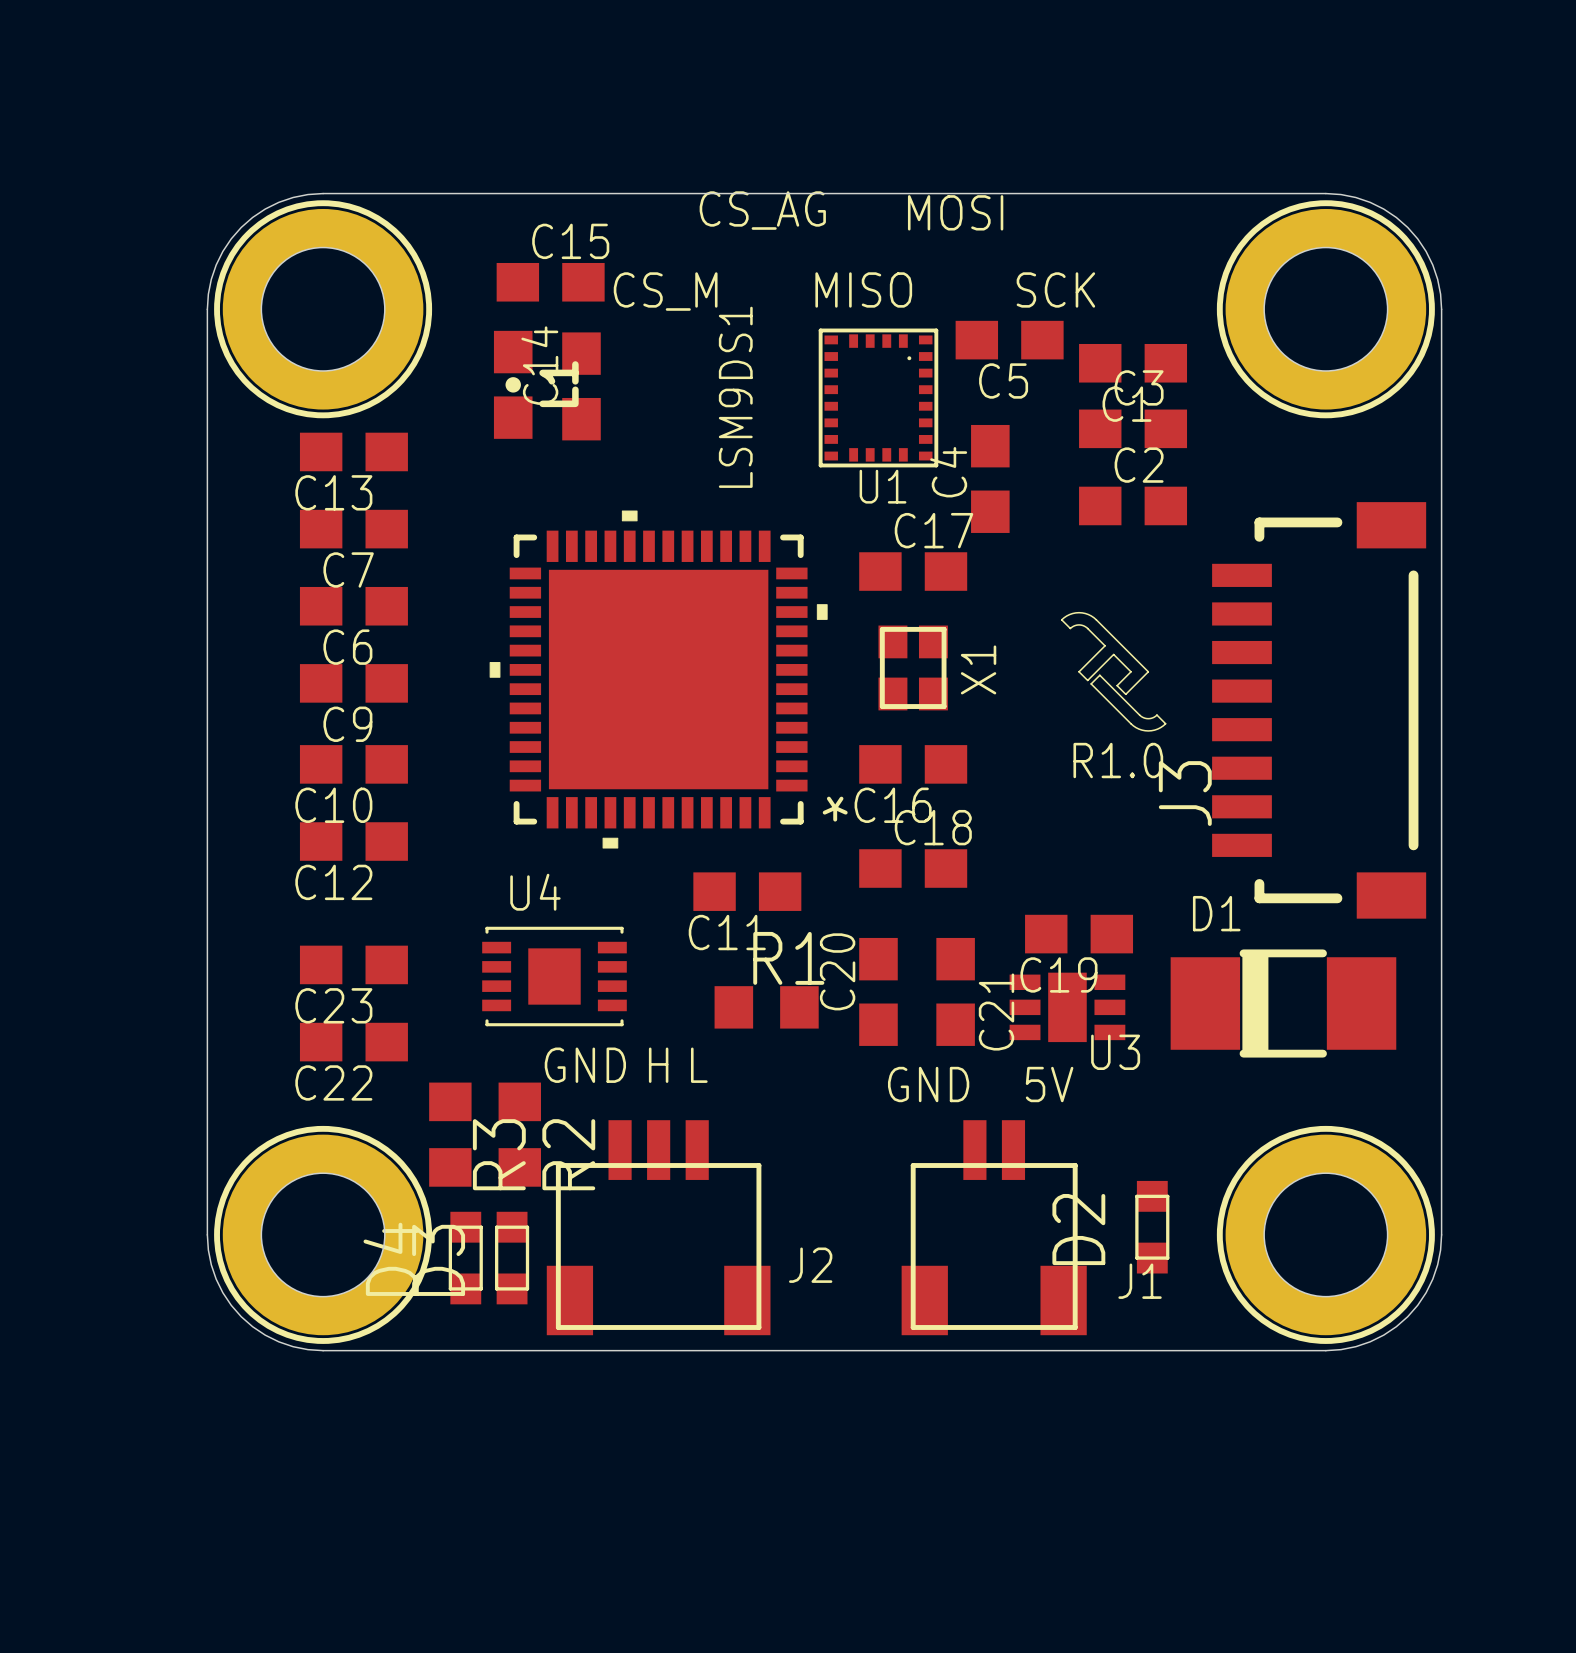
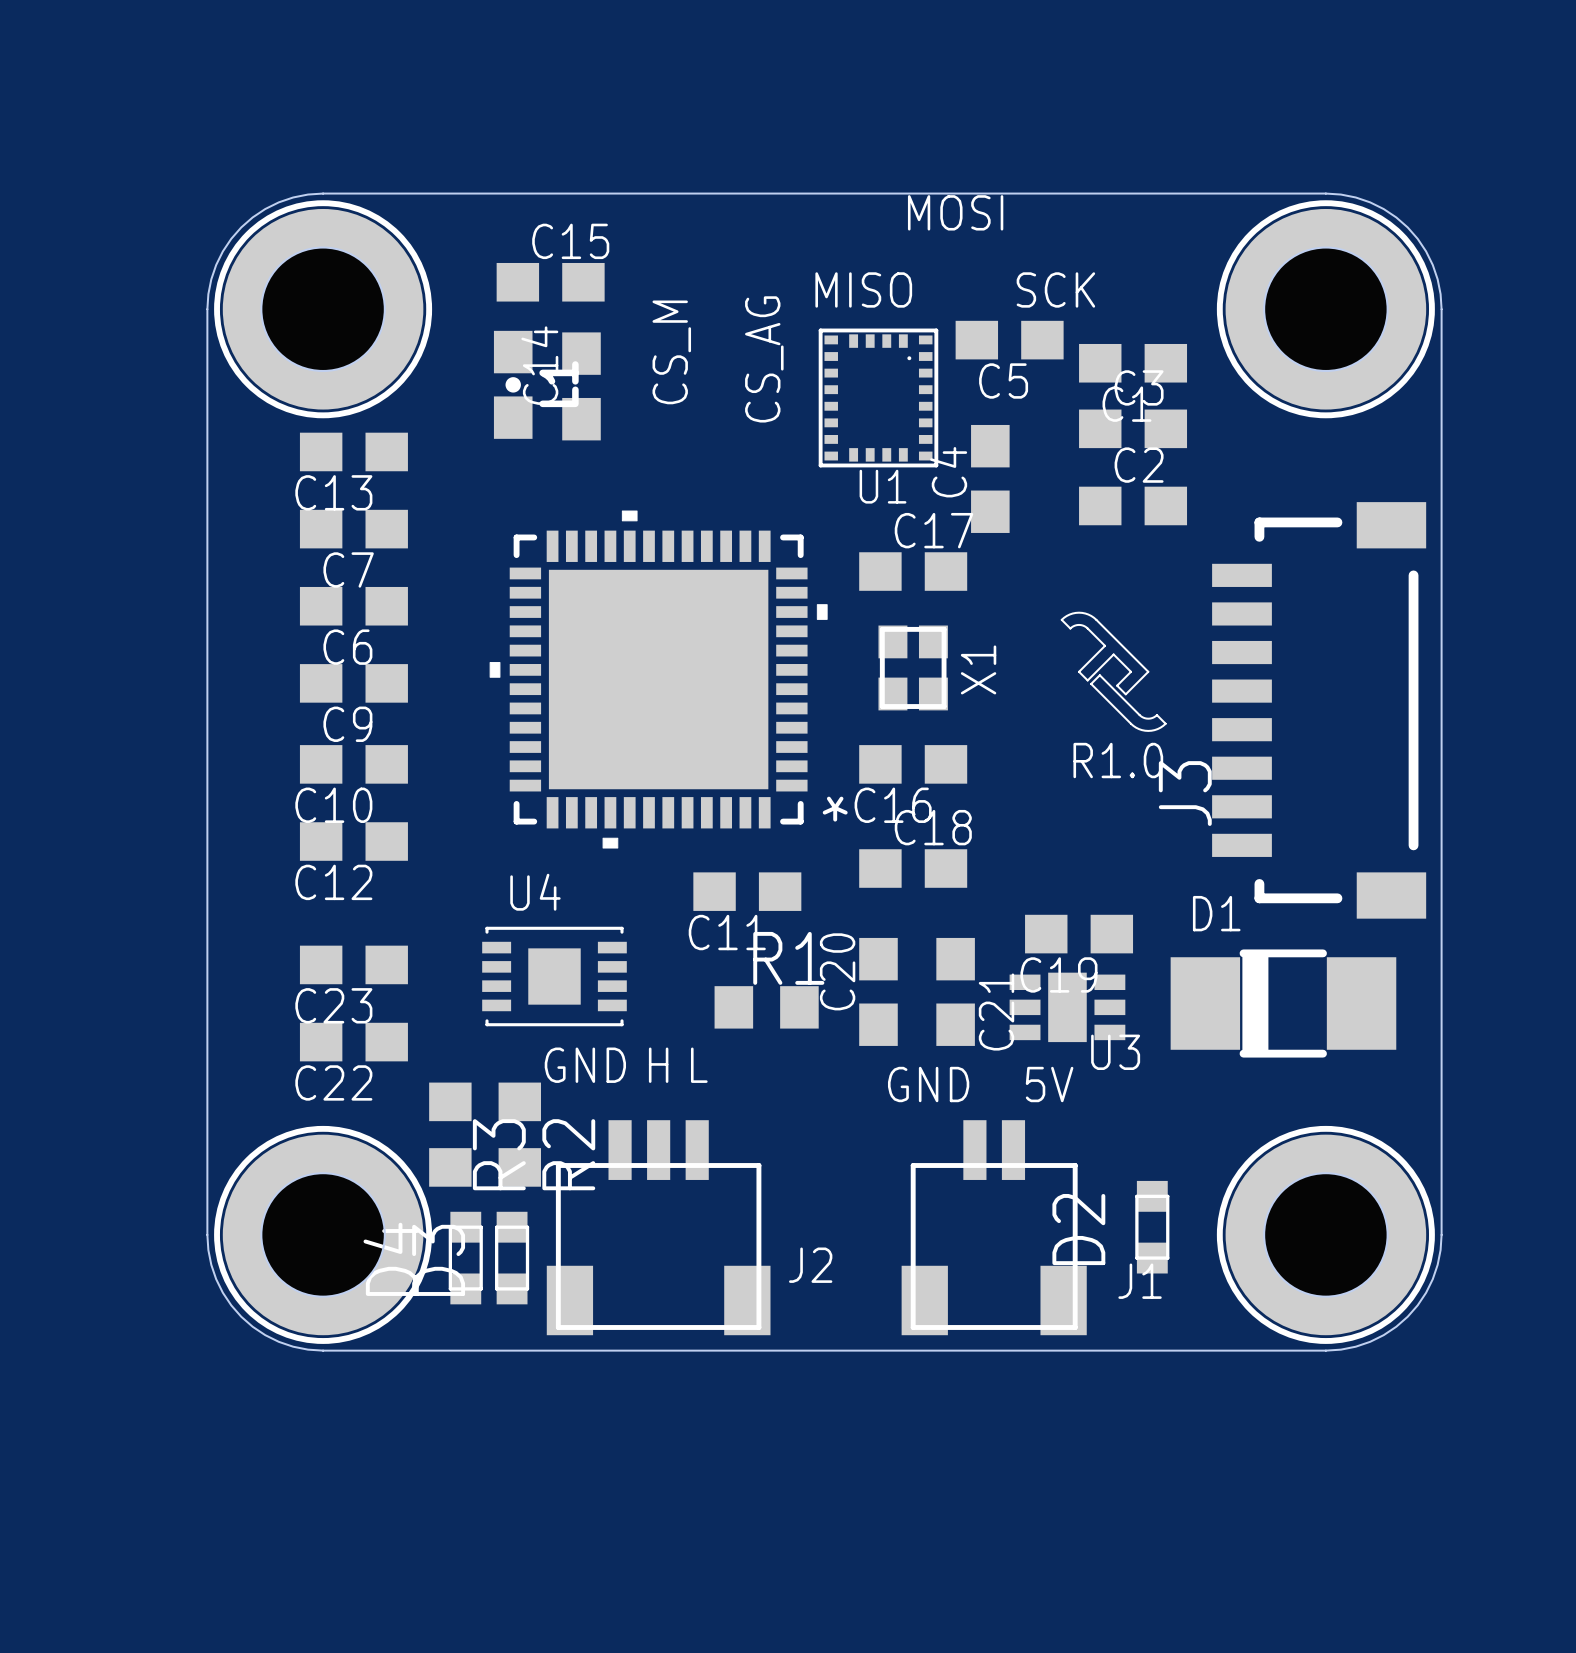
text rotation: 0° (762, 210) -> 90° counterclockwise (764, 359)
text rotation: 0° (665, 291) -> 90° counterclockwise (671, 352)
U1 value: LSM9DS1 (735, 397) -> none

